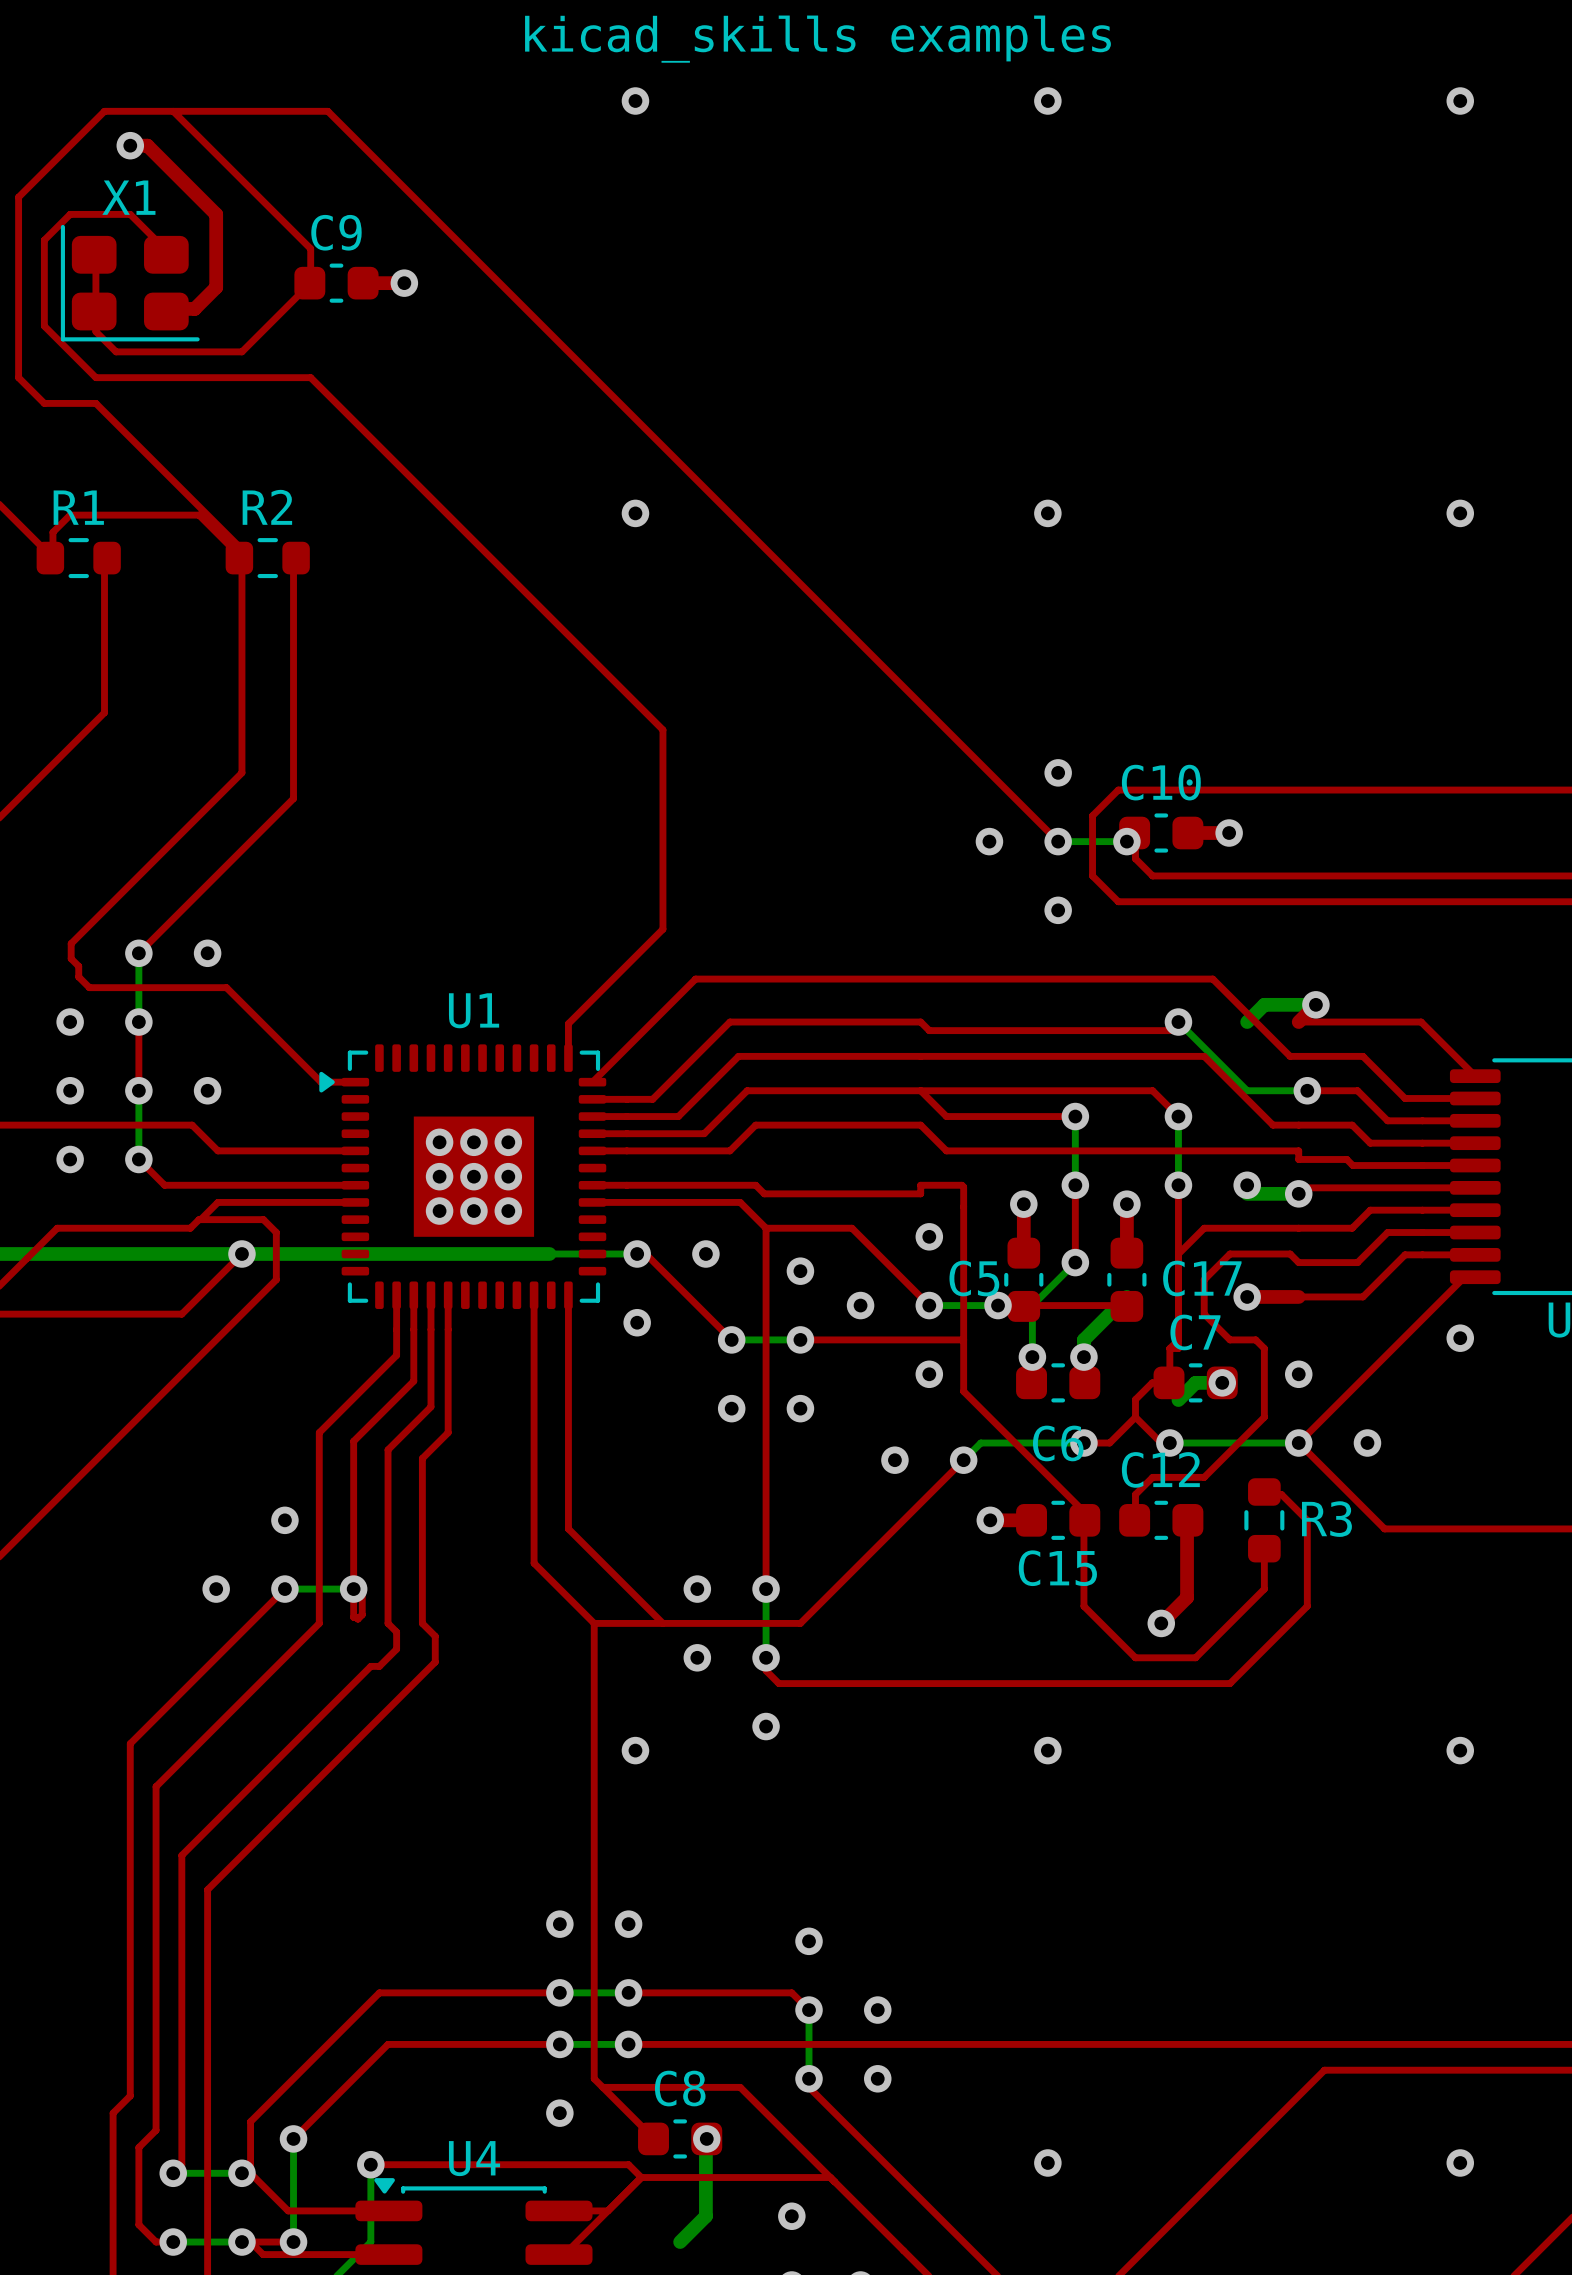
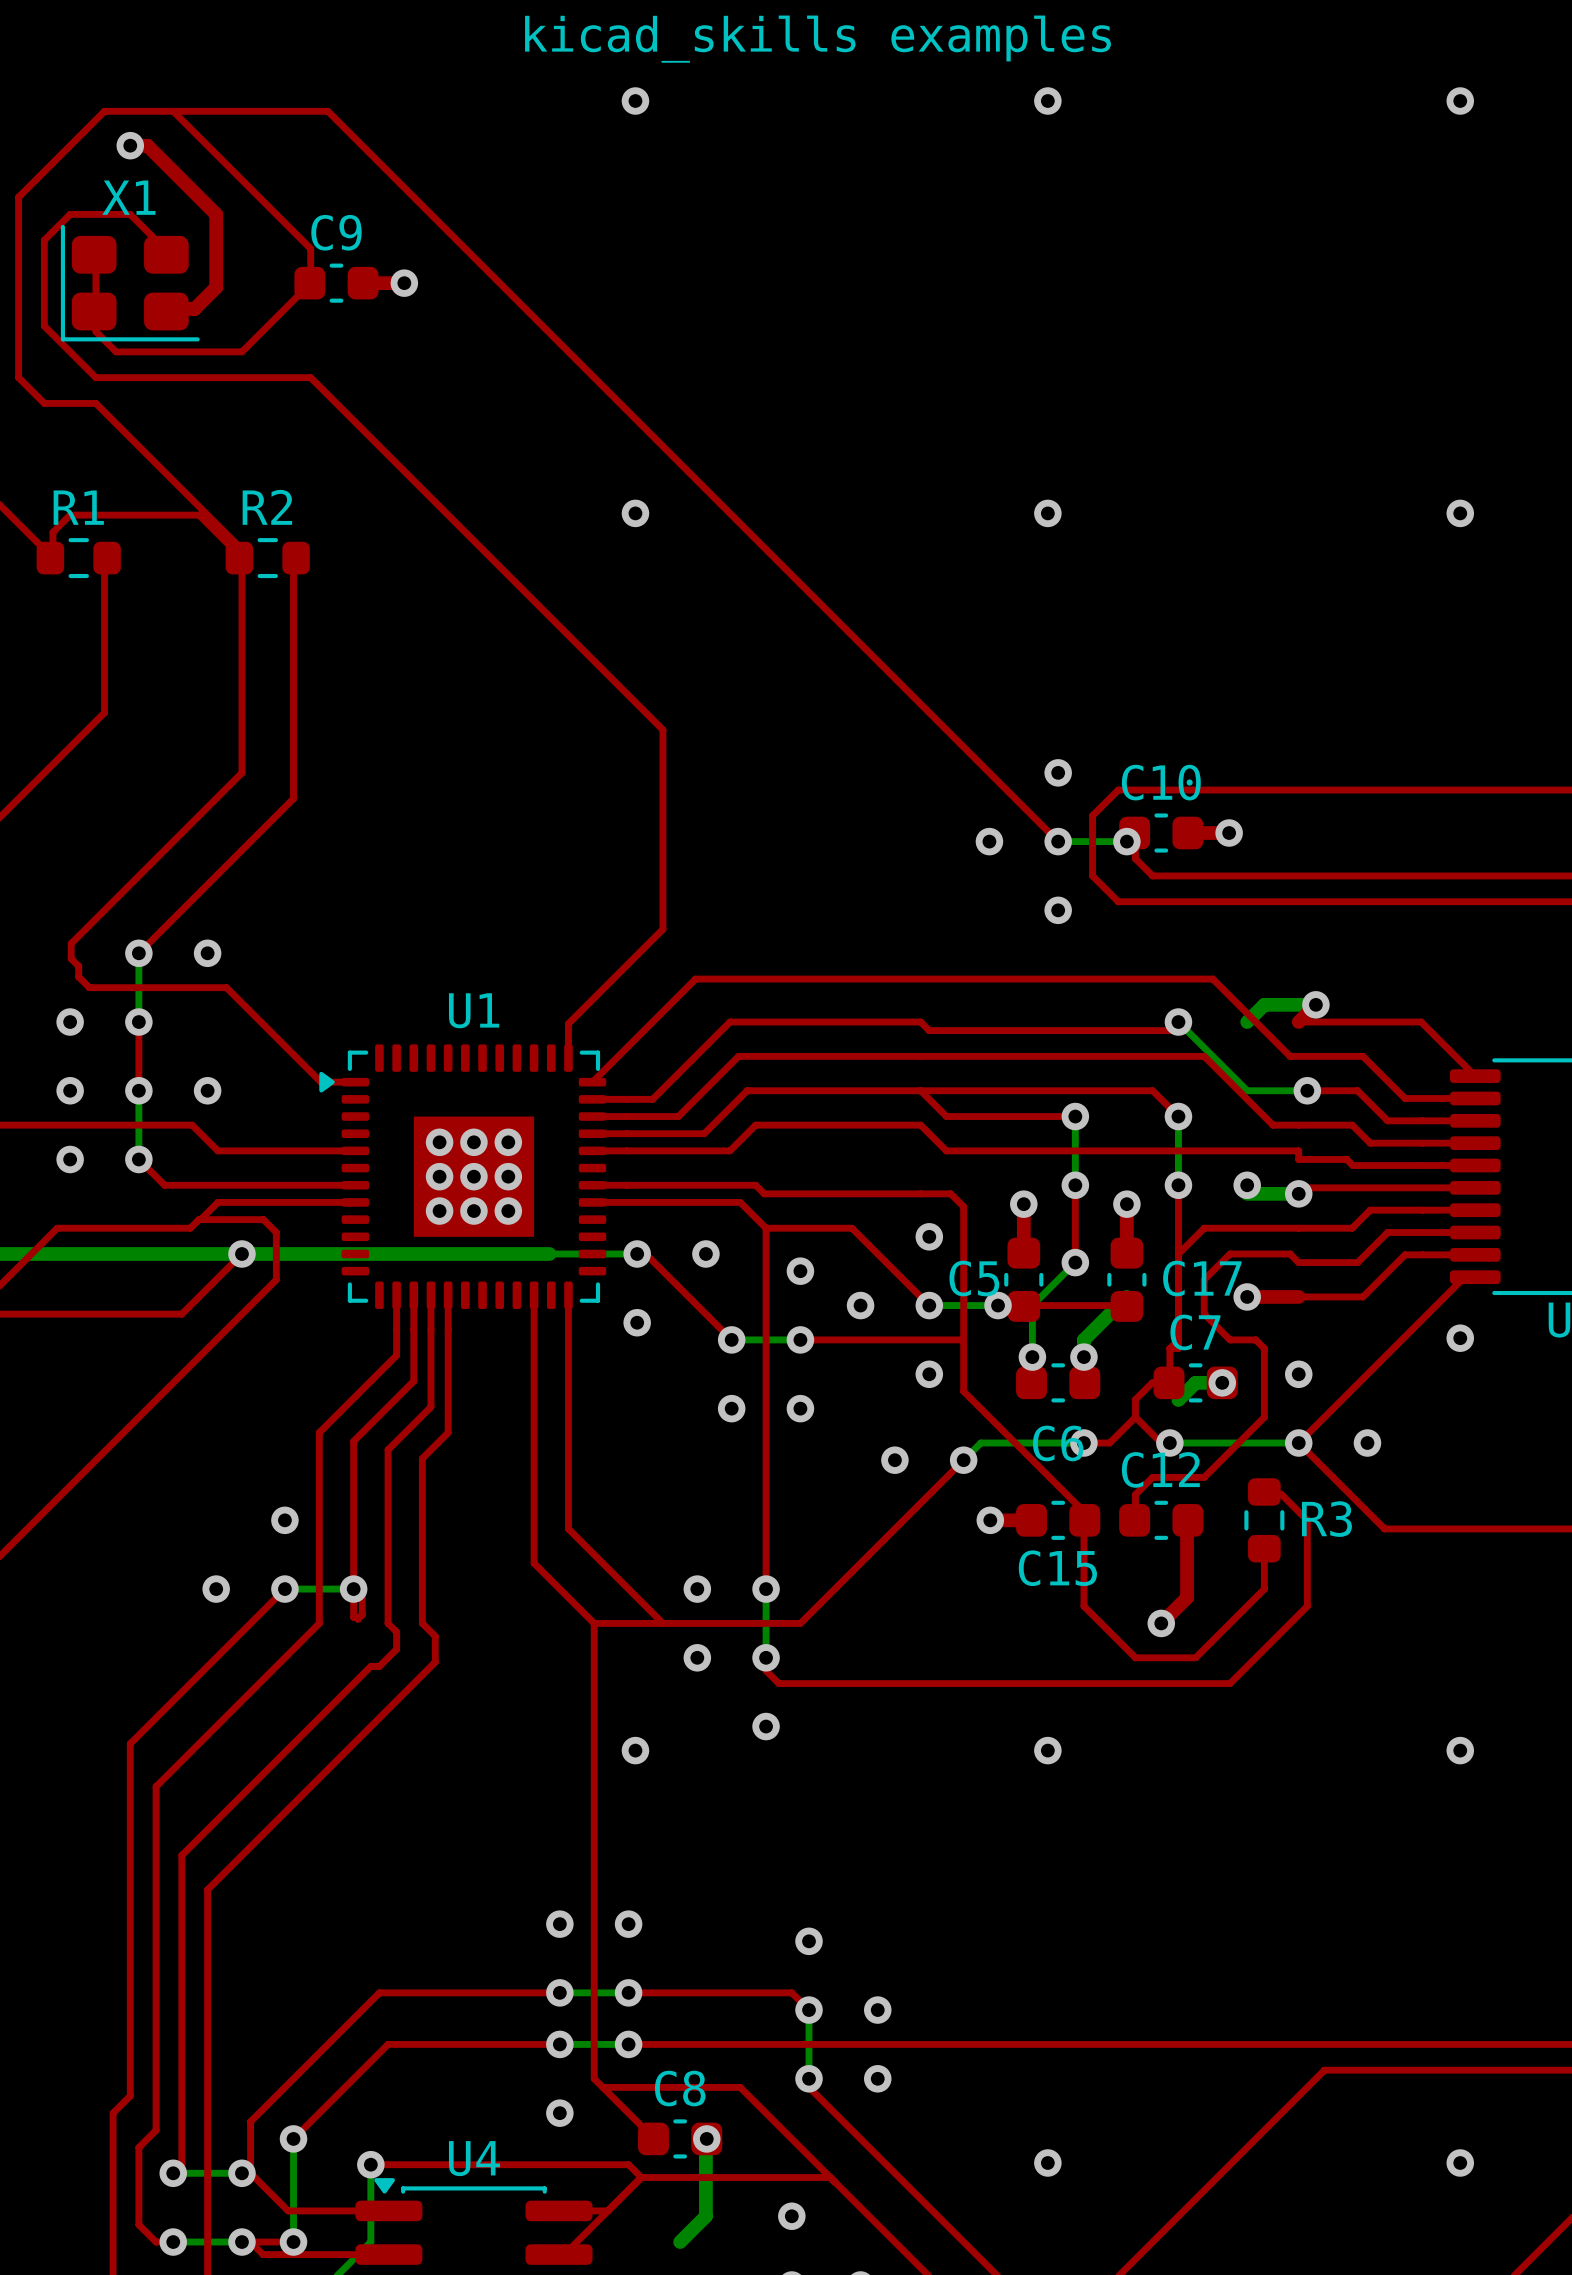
top track: (920, 1193) (920, 1185) (961, 1185) (963, 1186) (963, 1206) -> (920, 1193) (950, 1193) (963, 1206)

